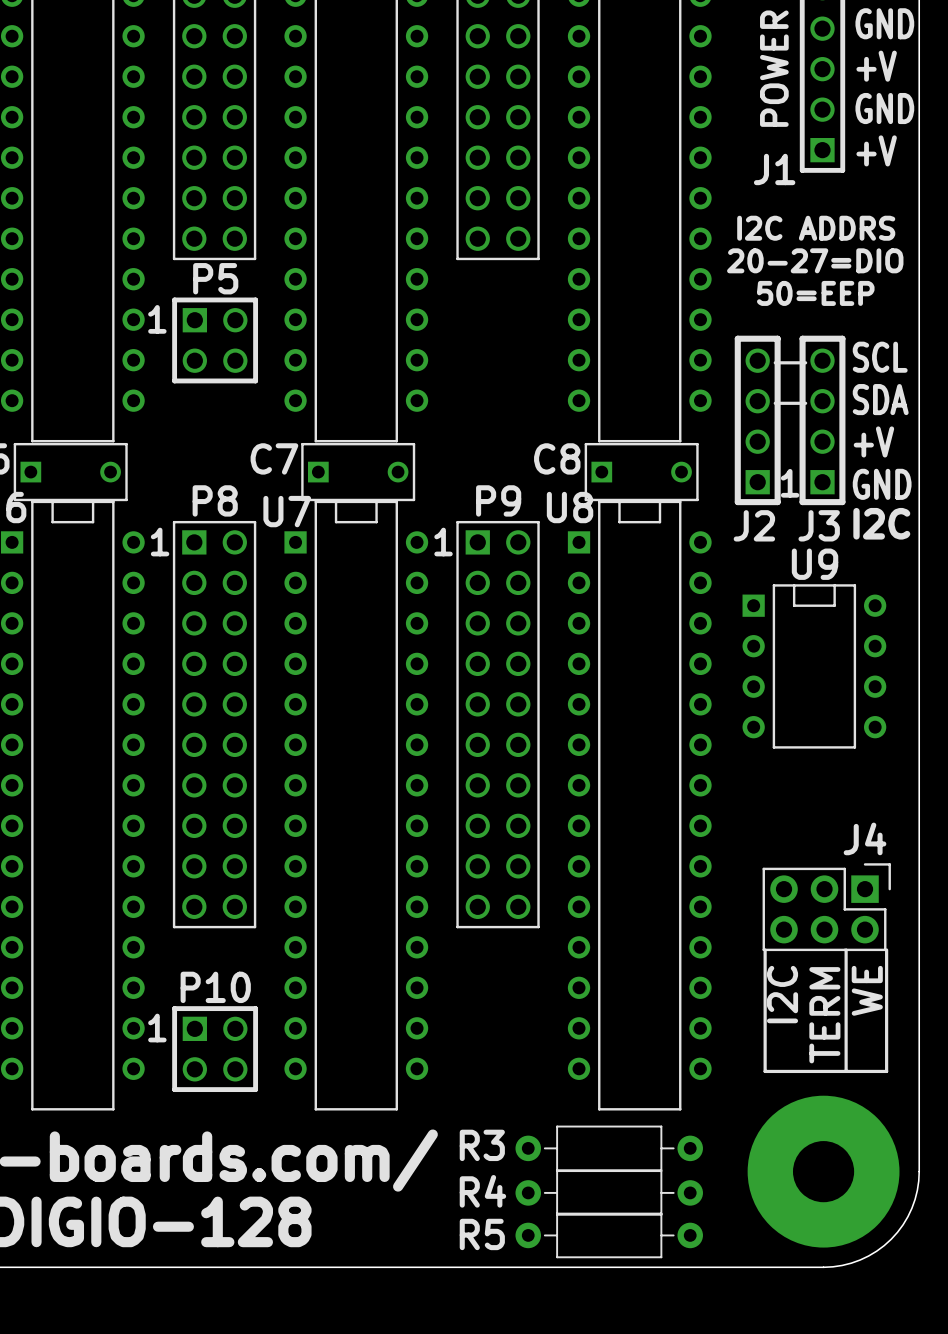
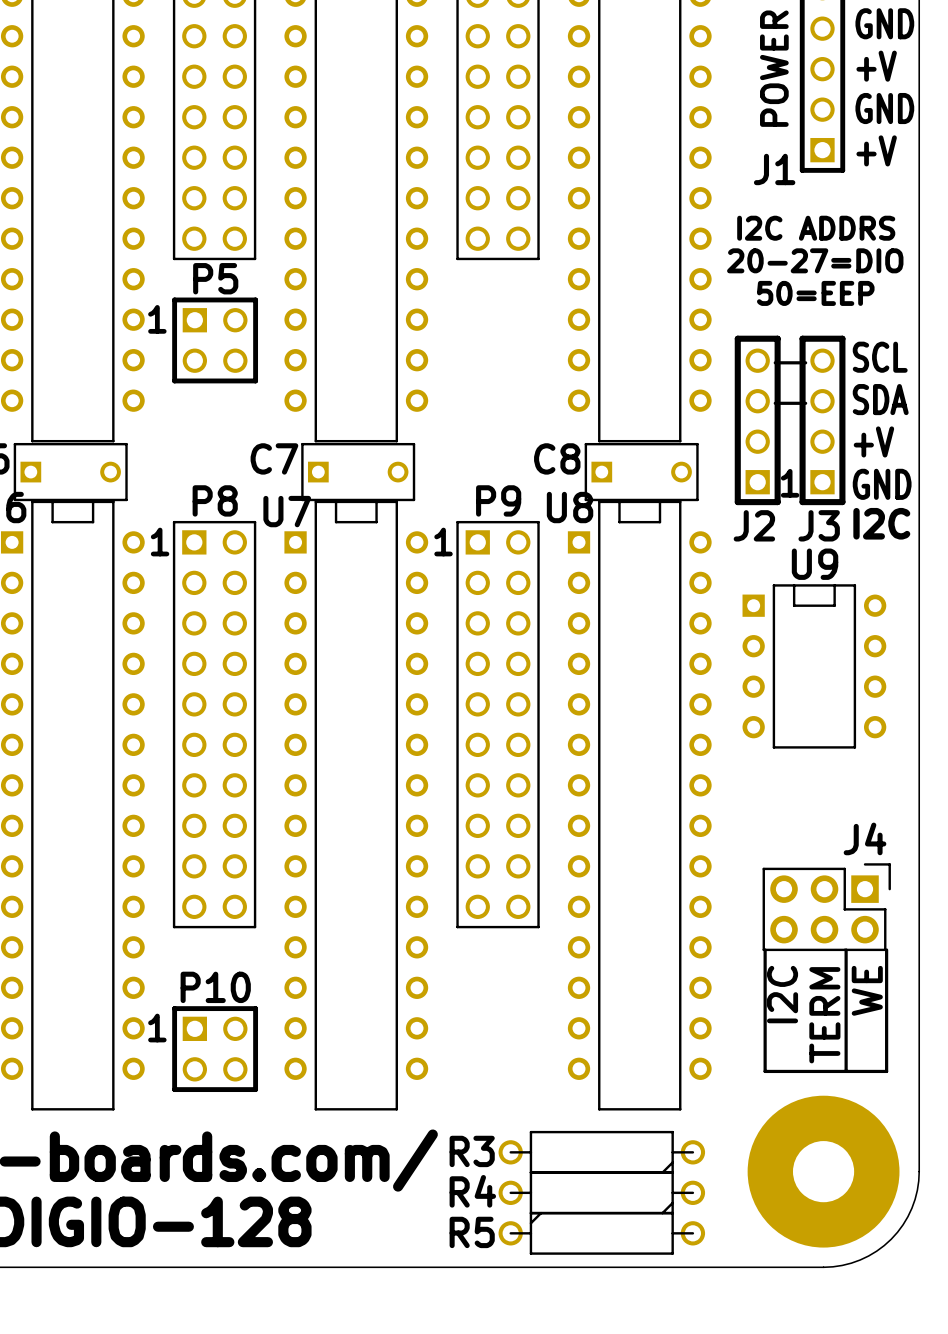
R3 footprint: [515, 1125, 703, 1172] -> [498, 1130, 706, 1174]
R4 footprint: [515, 1170, 703, 1216] -> [498, 1171, 706, 1215]
R5 footprint: [515, 1212, 703, 1259] -> [498, 1211, 706, 1255]

